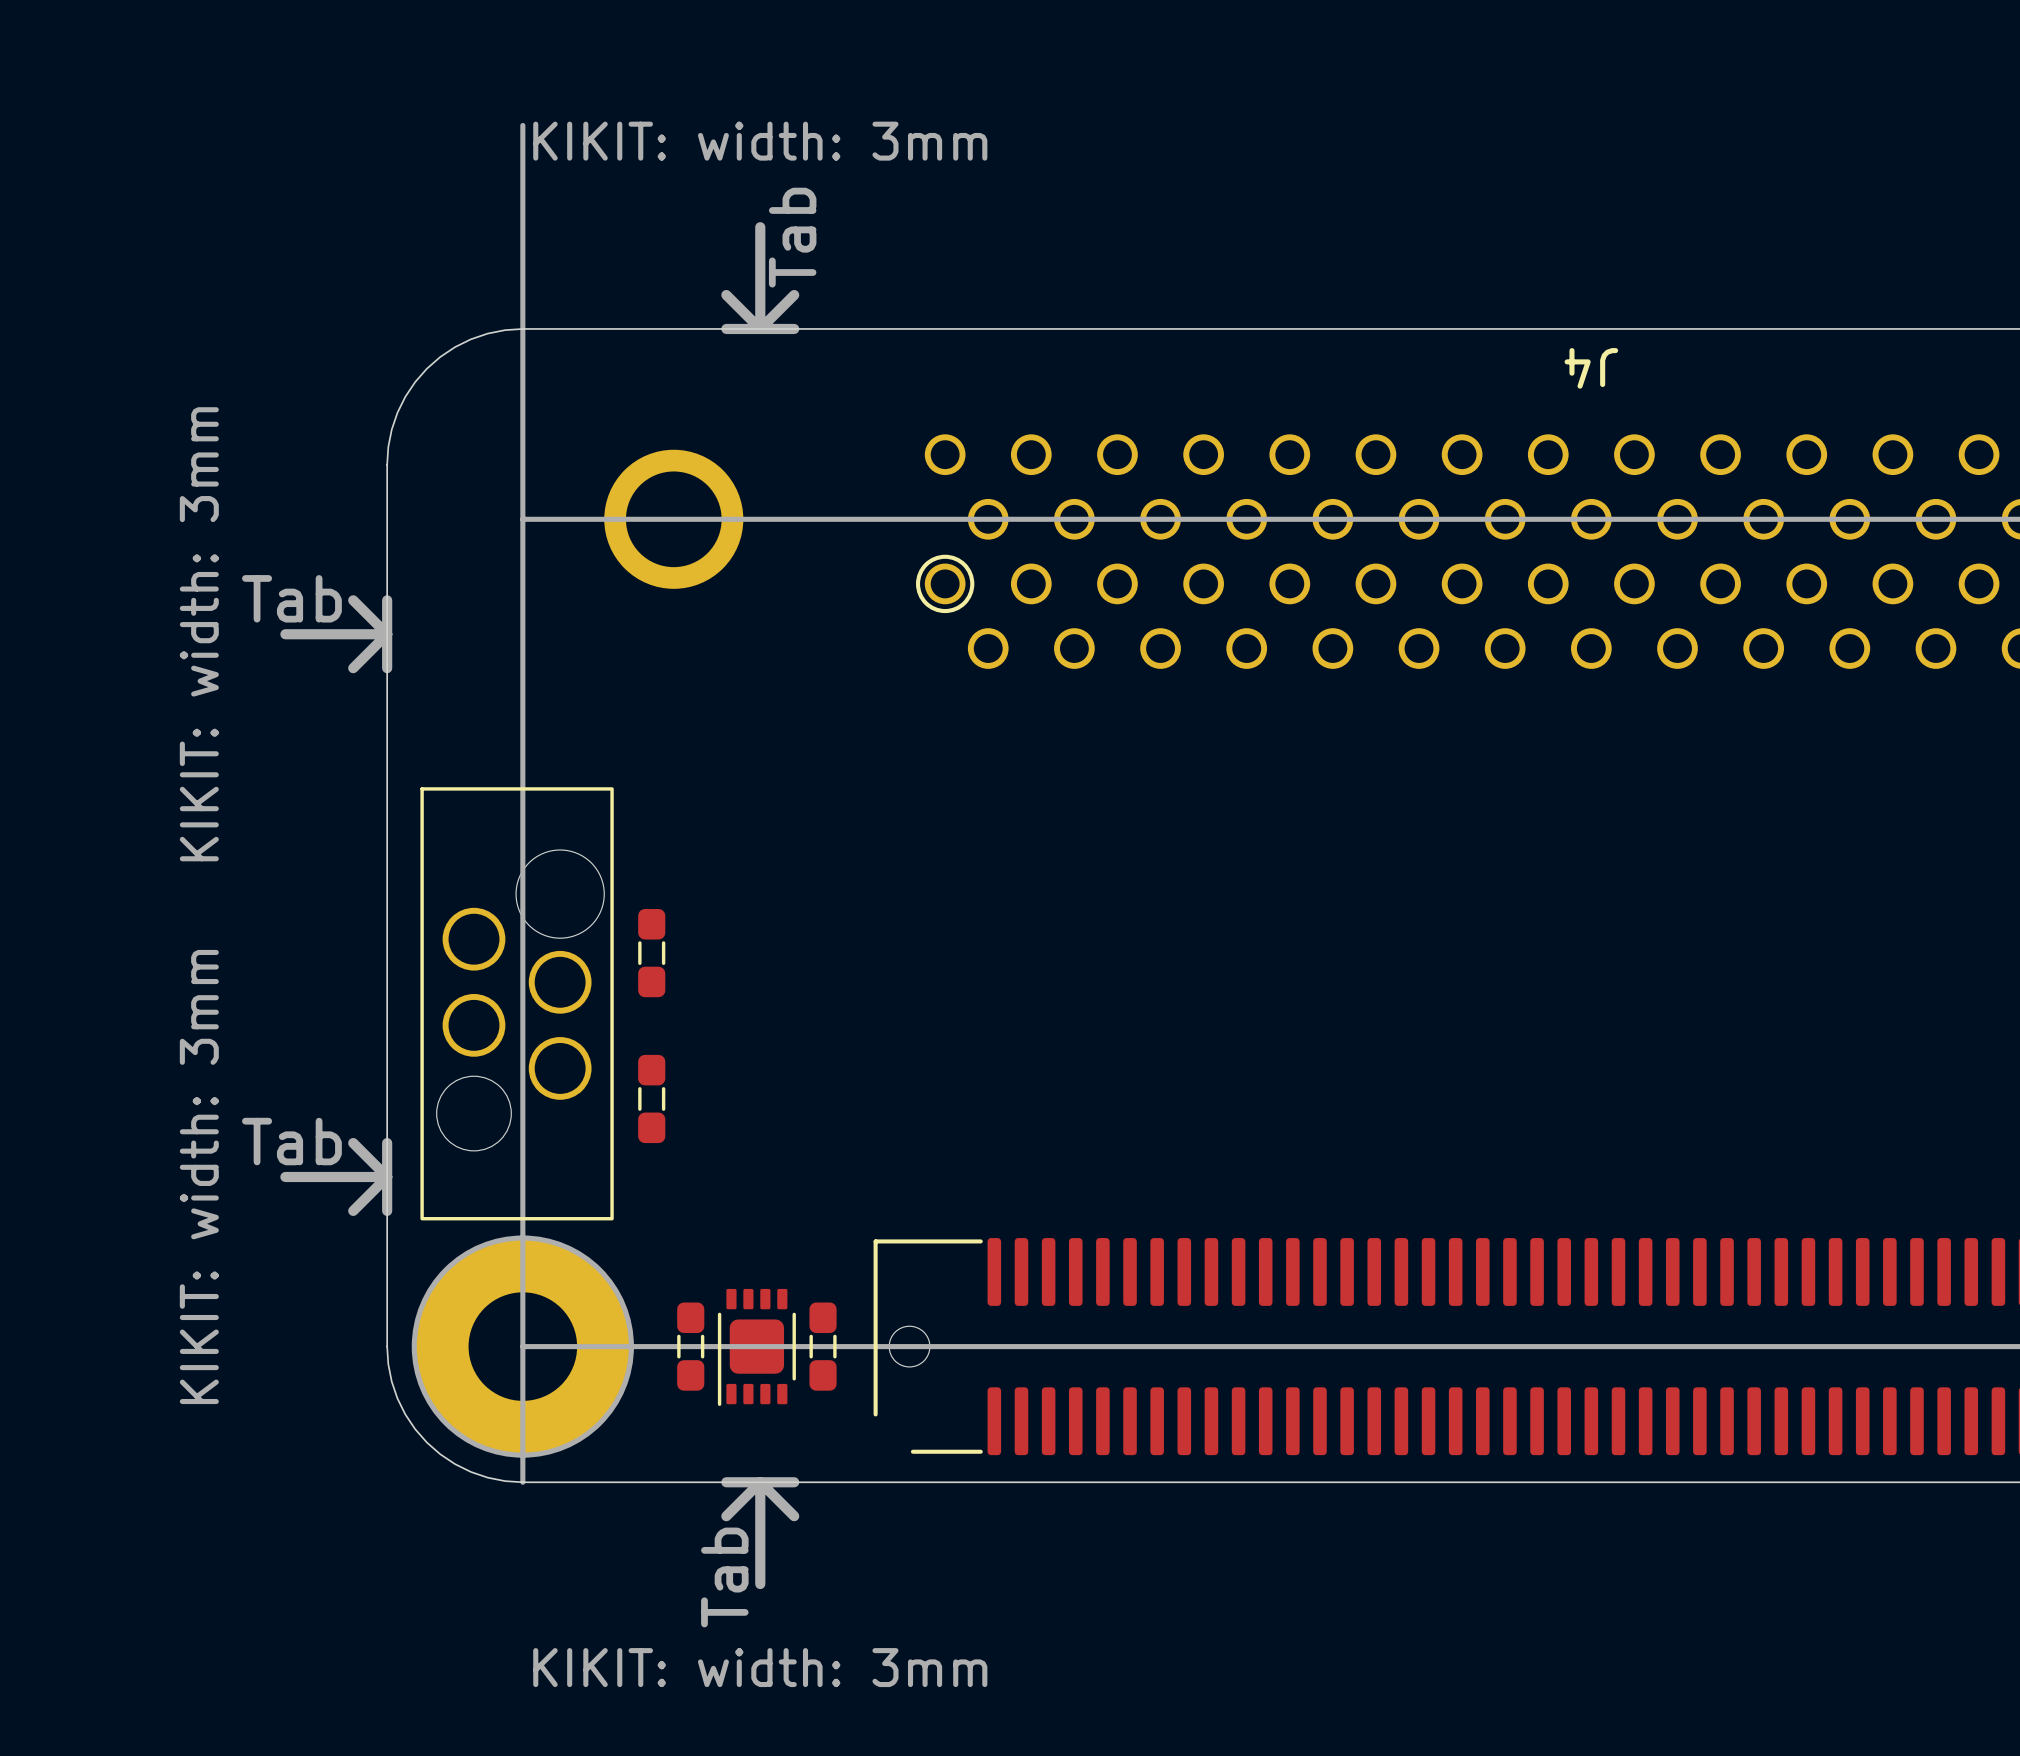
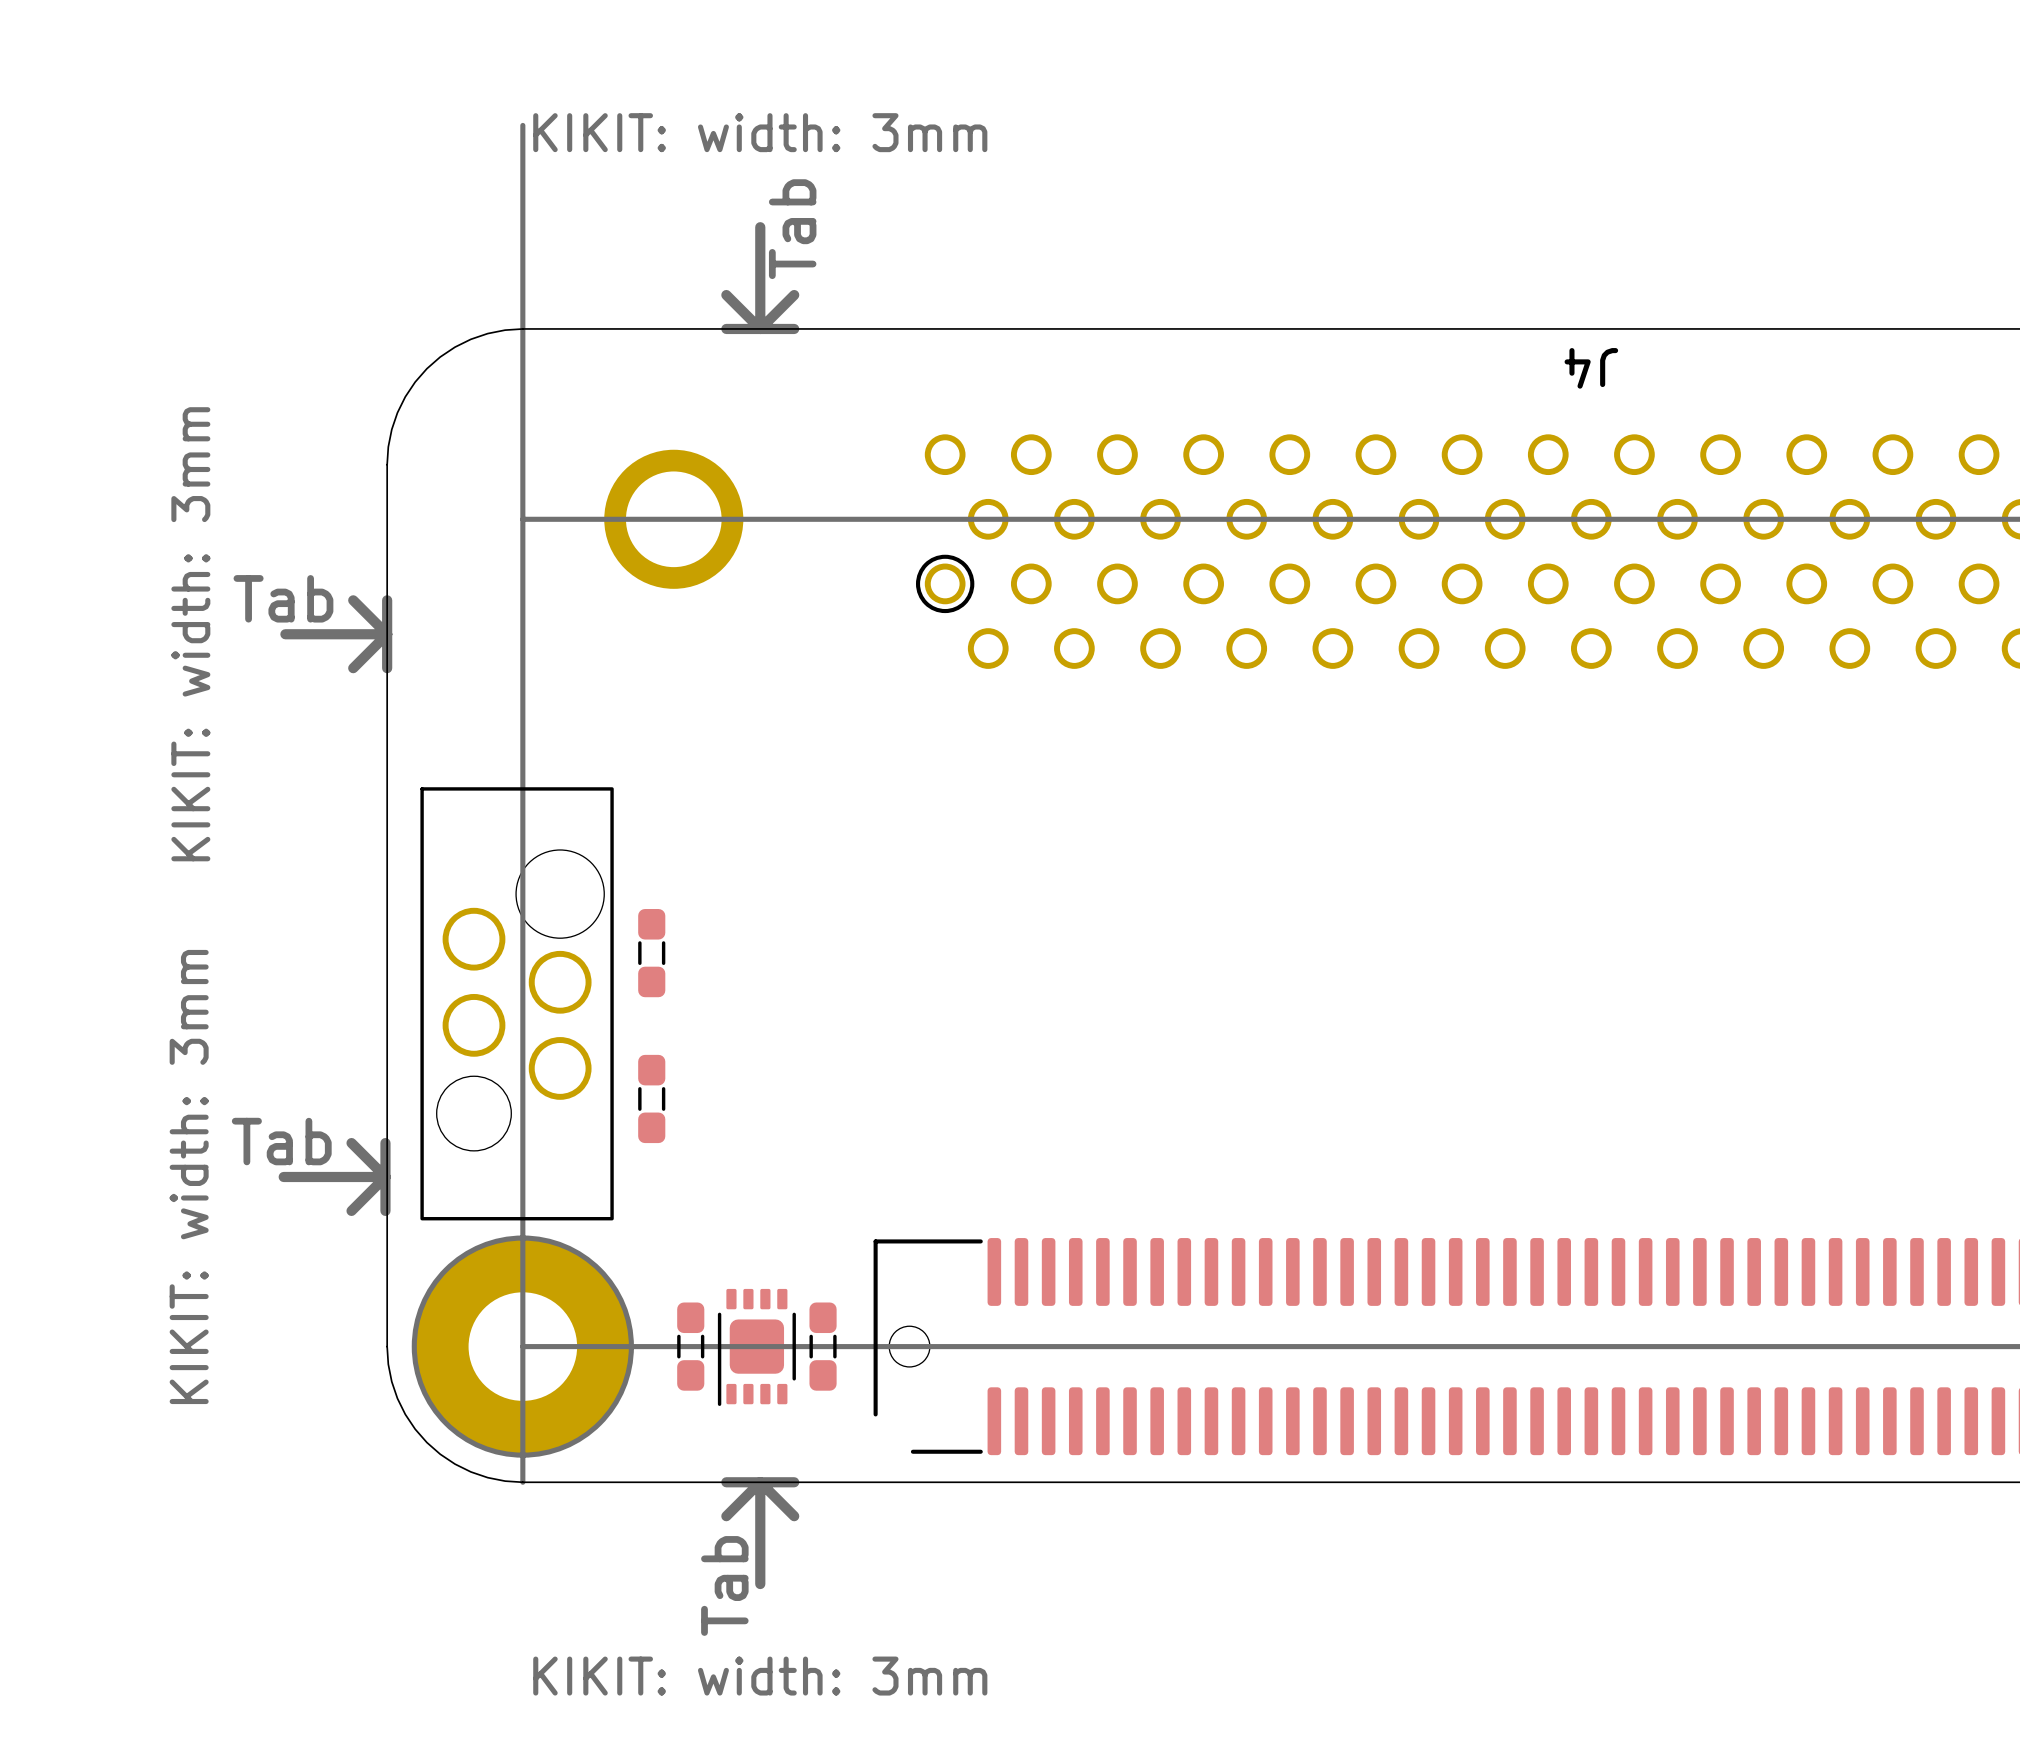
drawing shape: [533, 121, 988, 335] -> [533, 113, 988, 335]
drawing shape: [179, 407, 393, 862] -> [171, 407, 393, 862]
drawing shape: [179, 949, 393, 1405] -> [169, 949, 391, 1405]
drawing shape: [533, 1477, 988, 1688] -> [533, 1477, 988, 1696]

